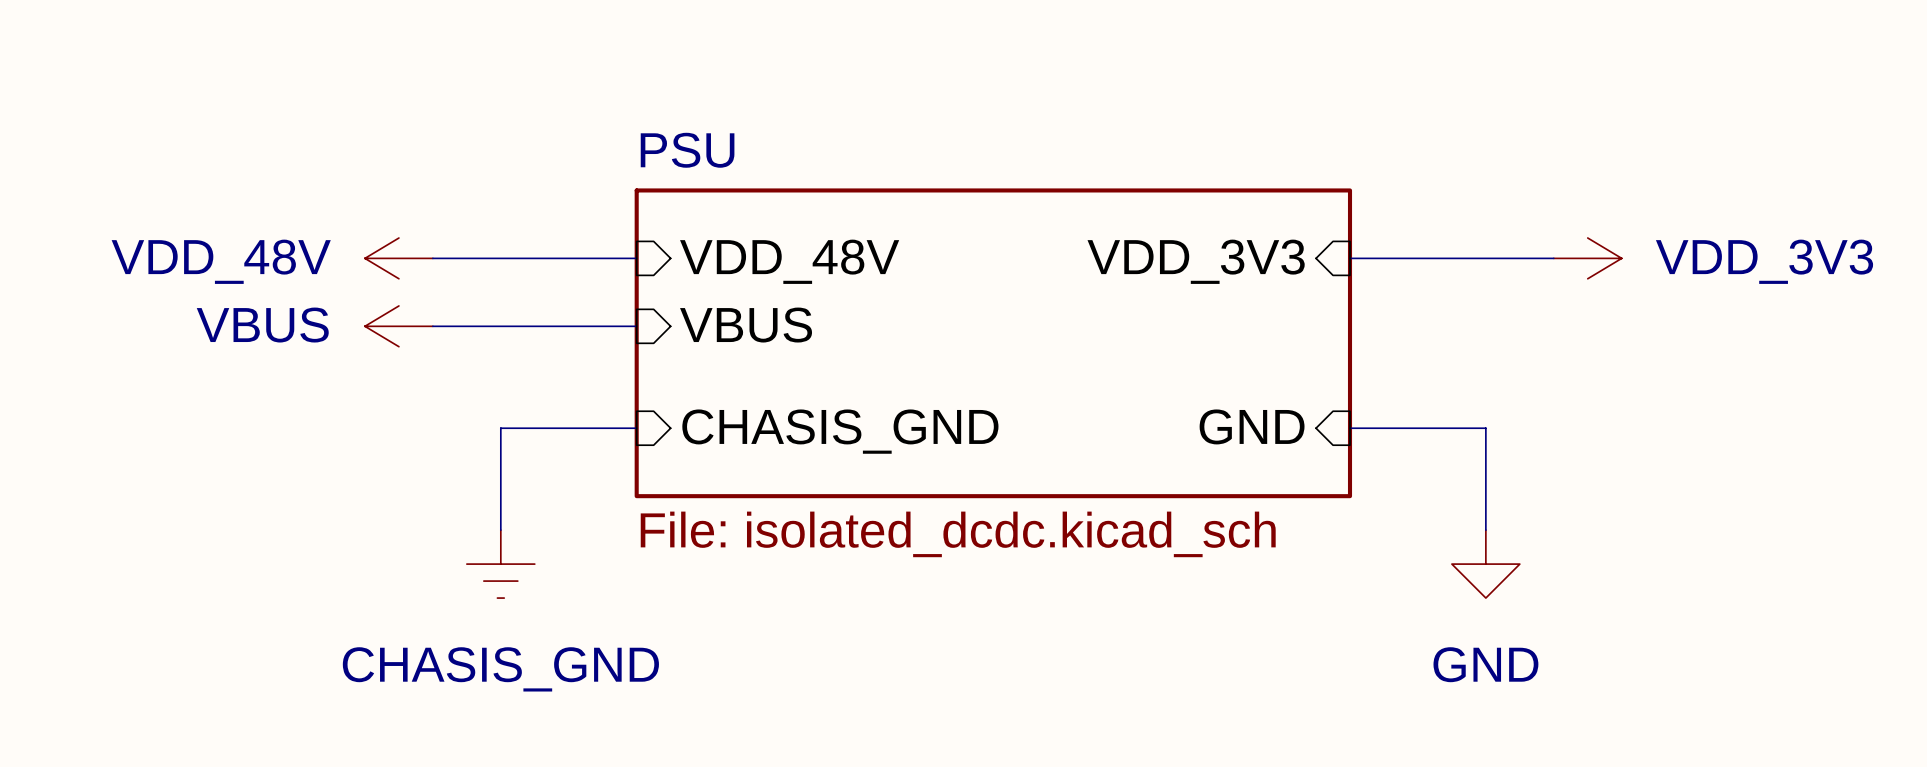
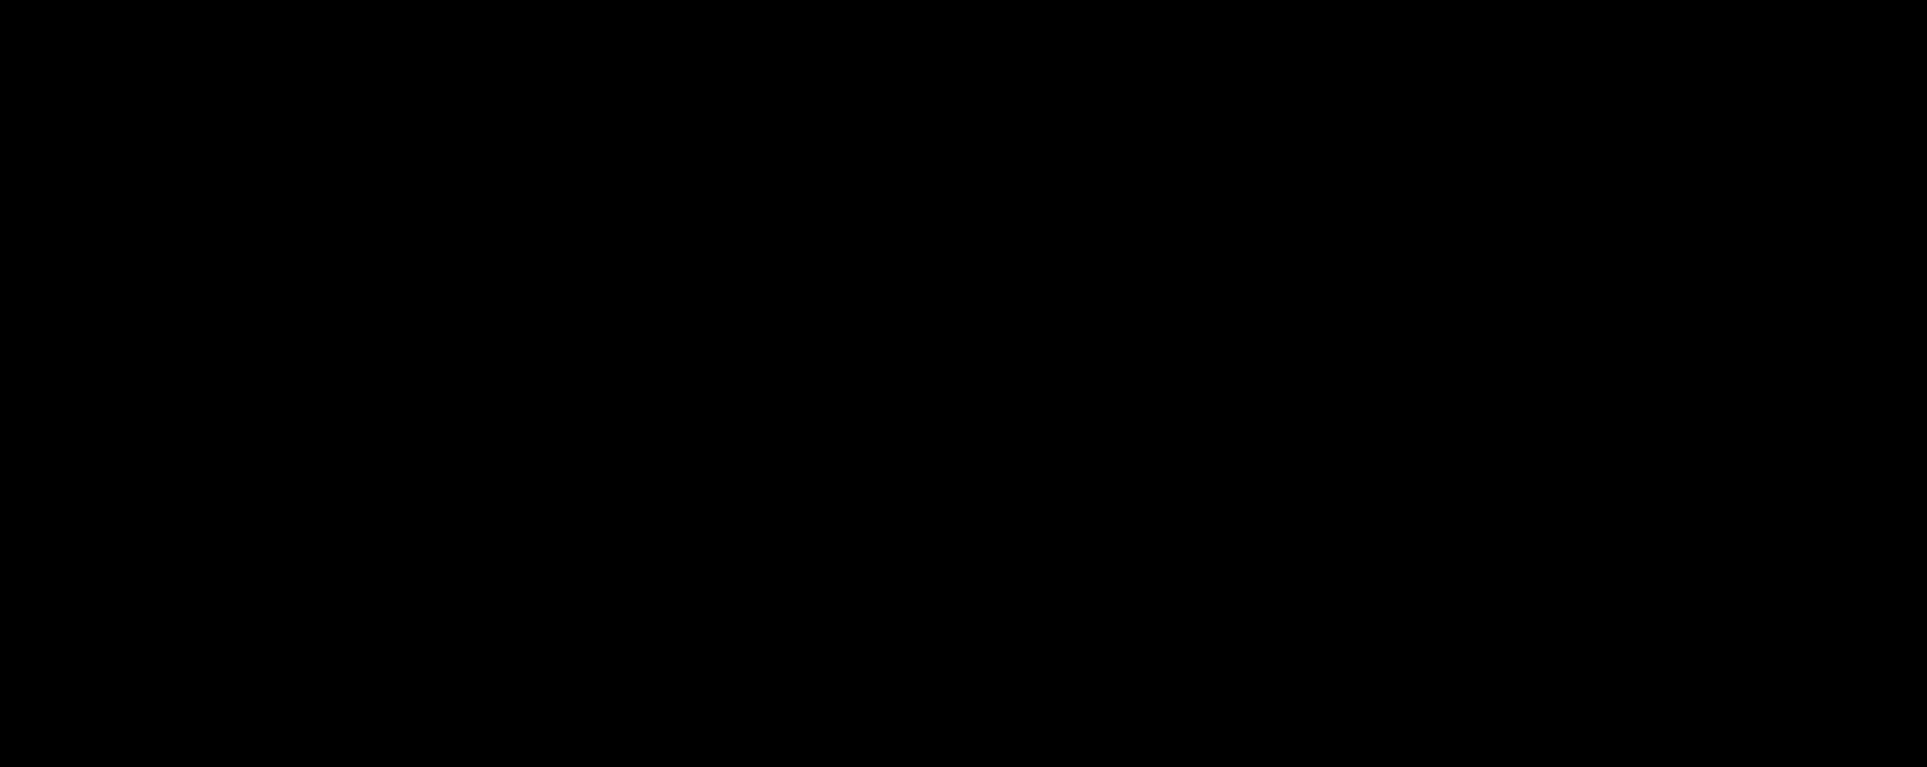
power symbol: VDD_48V (398, 258) -> none
wire: (432, 258) (636, 258) -> none
wire: (1350, 258) (1553, 258) -> none
power symbol: VDD_3V3 (1587, 258) -> none
sheet pin: VDD_48V (789, 261) -> none
sheet pin: VDD_3V3 (1196, 261) -> none
sheet pin: VBUS (746, 325) -> none
power symbol: VBUS (398, 326) -> none
wire: (432, 326) (636, 326) -> none
sheet PSU: File: isolated_dcdc.kicad_sch (993, 343) -> none
sheet pin: GND (1252, 426) -> none
wire: (636, 428) (500, 428) (500, 530) -> none
wire: (1350, 428) (1485, 428) (1485, 530) -> none
sheet pin: CHASIS_GND (840, 431) -> none
power symbol: CHASIS_GND (500, 564) -> none
power symbol: GND (1485, 564) -> none

